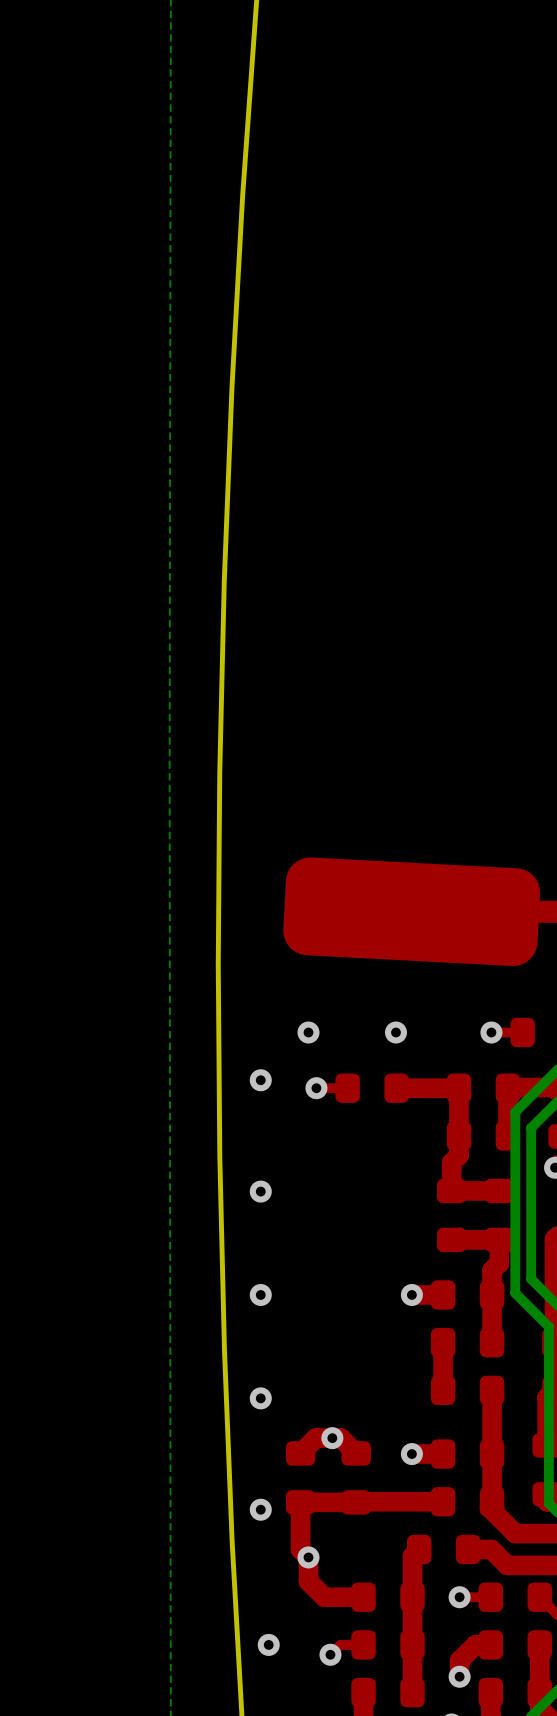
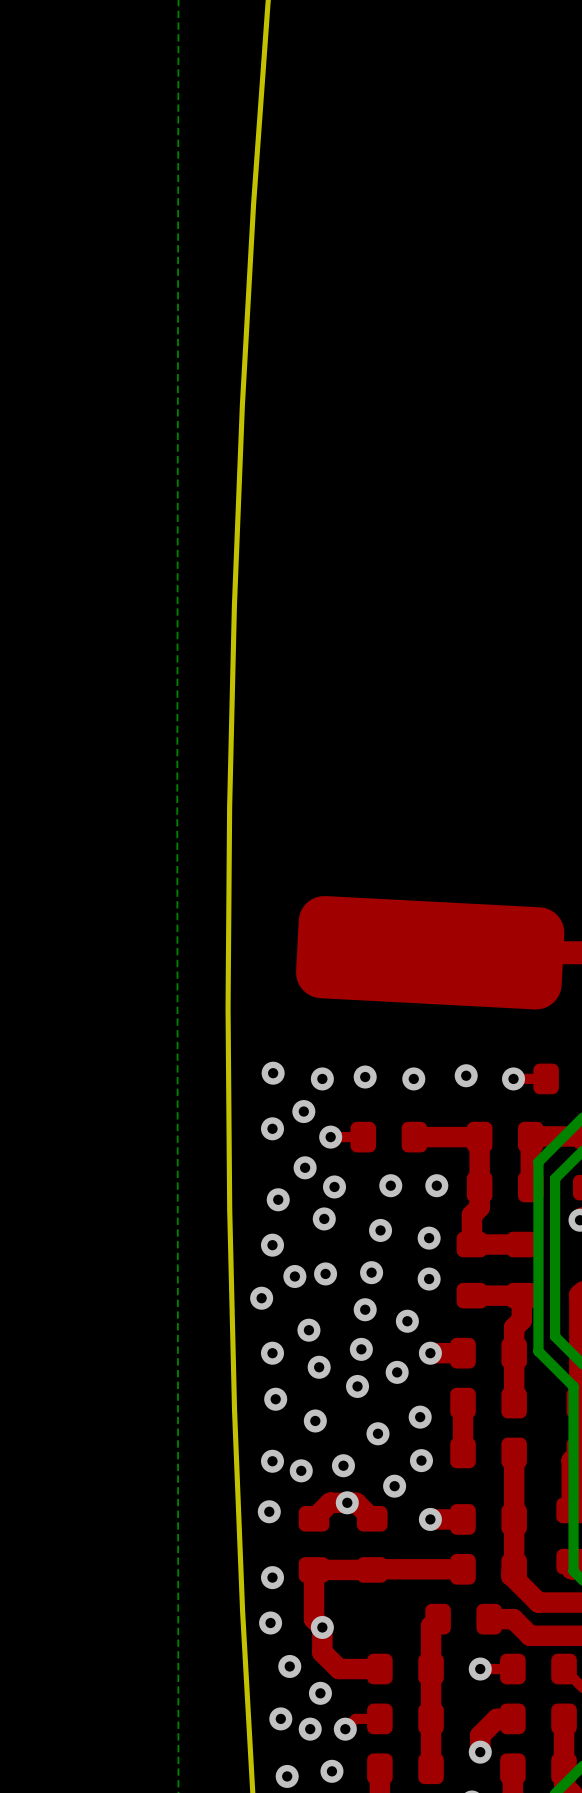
via: none -> (273, 1073)
via: none -> (466, 1075)
via: none -> (365, 1077)
via: none -> (303, 1111)
via: none -> (305, 1167)
via: none -> (390, 1185)
via: none -> (436, 1185)
via: none -> (334, 1186)
via: none -> (278, 1199)
via: none -> (324, 1218)
via: none -> (380, 1230)
via: none -> (429, 1238)
via: none -> (371, 1272)
via: none -> (325, 1273)
via: none -> (294, 1276)
via: none -> (429, 1279)
via: none -> (261, 1298)
via: none -> (365, 1309)
via: none -> (407, 1321)
via: none -> (308, 1330)
via: none -> (361, 1349)
via: none -> (319, 1367)
via: none -> (397, 1372)
via: none -> (357, 1386)
via: none -> (275, 1399)
via: none -> (420, 1417)
via: none -> (315, 1420)
via: none -> (377, 1433)
via: none -> (421, 1460)
via: none -> (343, 1465)
via: none -> (301, 1470)
via: none -> (394, 1486)
via: none -> (269, 1511)
via: none -> (270, 1623)
via: none -> (289, 1666)
via: none -> (320, 1693)
via: none -> (310, 1729)
via: none -> (331, 1771)
via: none -> (287, 1776)

